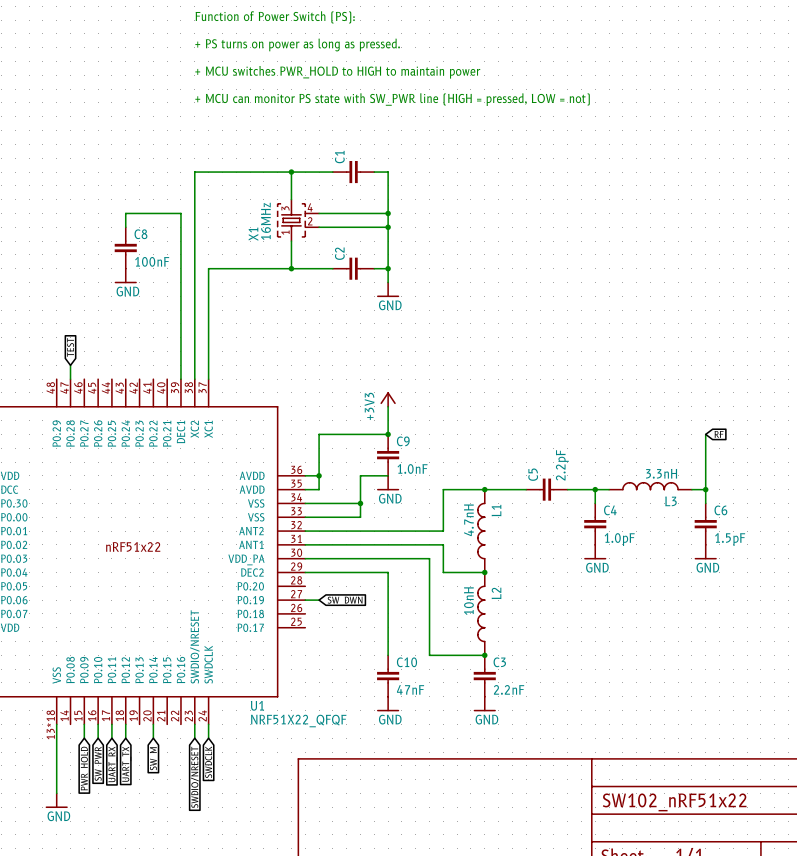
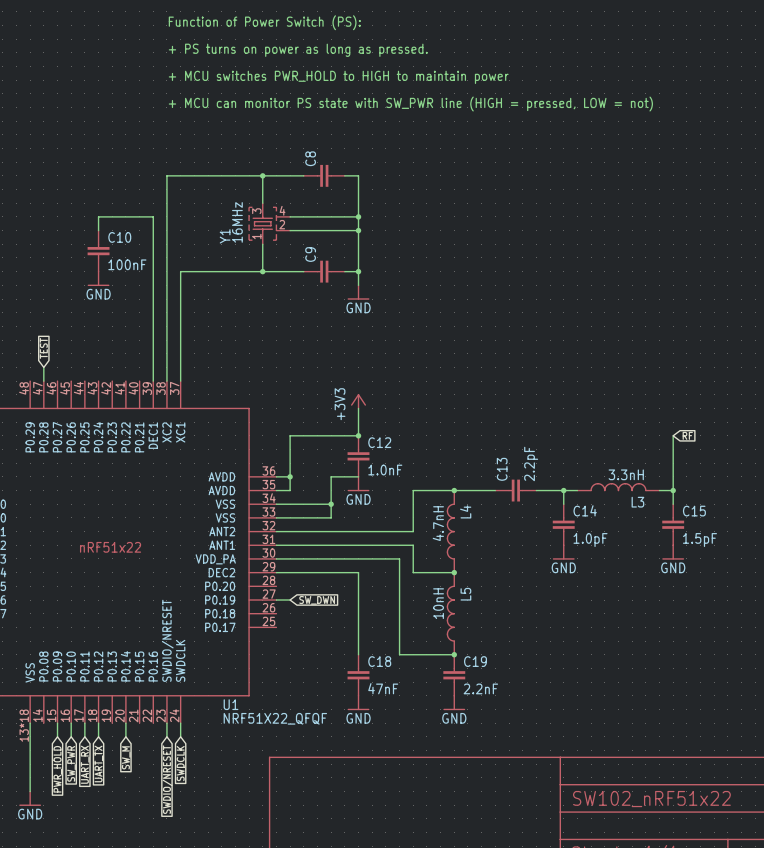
C1 name: C1 (339, 157) -> C8 (310, 158)
C8 name: C8 (140, 234) -> C10 (119, 237)
X1 name: X1 (253, 234) -> Y1 (225, 236)
C2 name: C2 (339, 253) -> C9 (310, 254)
C9 name: C9 (403, 441) -> C12 (379, 442)
C5 name: C5 (533, 474) -> C13 (502, 469)
L1 name: L1 (496, 510) -> L4 (465, 511)
C4 name: C4 (610, 510) -> C14 (585, 510)
C6 name: C6 (720, 510) -> C15 (694, 511)
L2 name: L2 (496, 593) -> L5 (465, 594)
C10 name: C10 (406, 662) -> C18 (379, 661)
C3 name: C3 (499, 662) -> C19 (475, 661)

